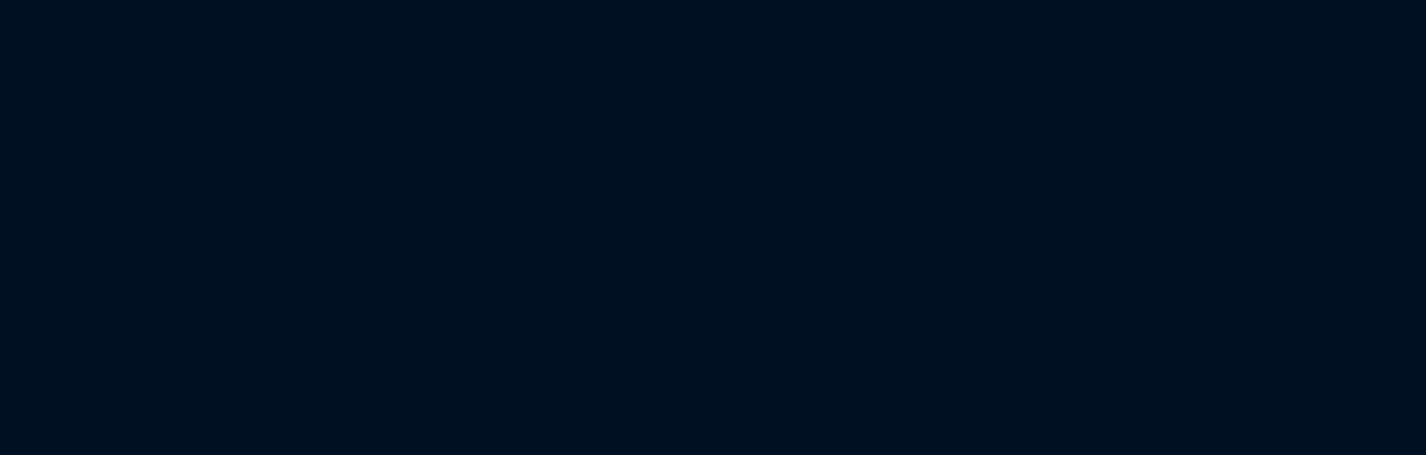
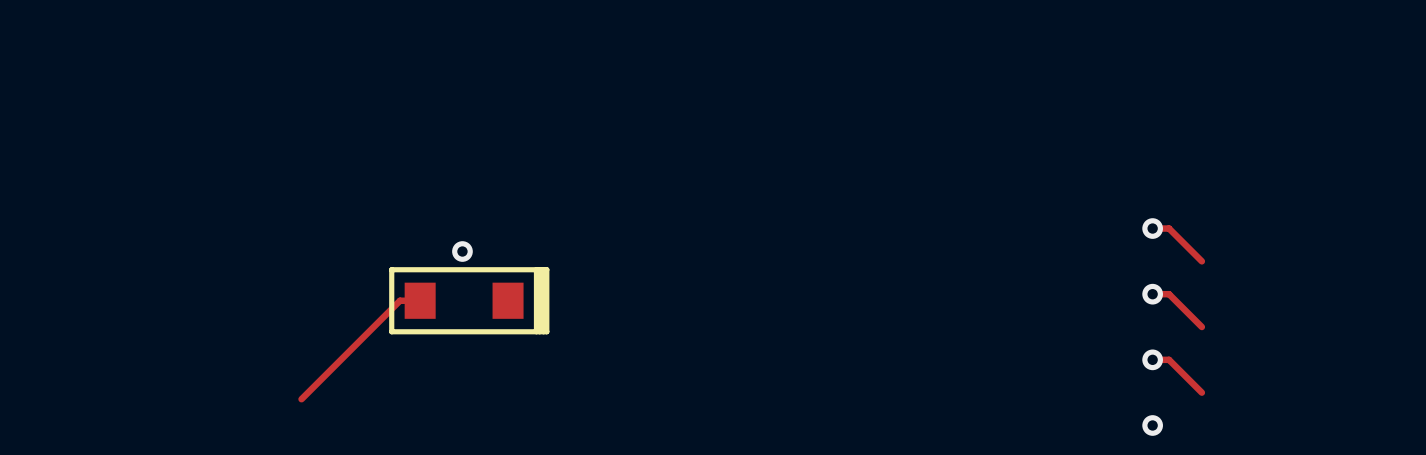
track: none -> (1152, 228) (1169, 228) (1201, 261)
via: none -> (1152, 228)
via: none -> (462, 251)
track: none -> (1152, 294) (1169, 294) (1201, 327)
via: none -> (1152, 294)
track: none -> (420, 300) (400, 300) (301, 399)
part: none -> (469, 300)
track: none -> (1152, 359) (1169, 359) (1201, 392)
via: none -> (1152, 359)
via: none -> (1152, 425)

